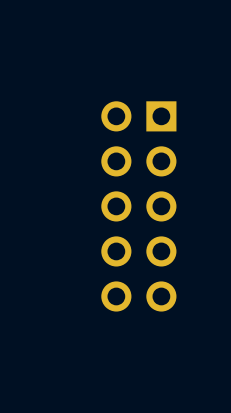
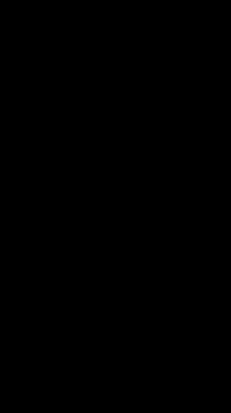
part: (138, 206) -> none

